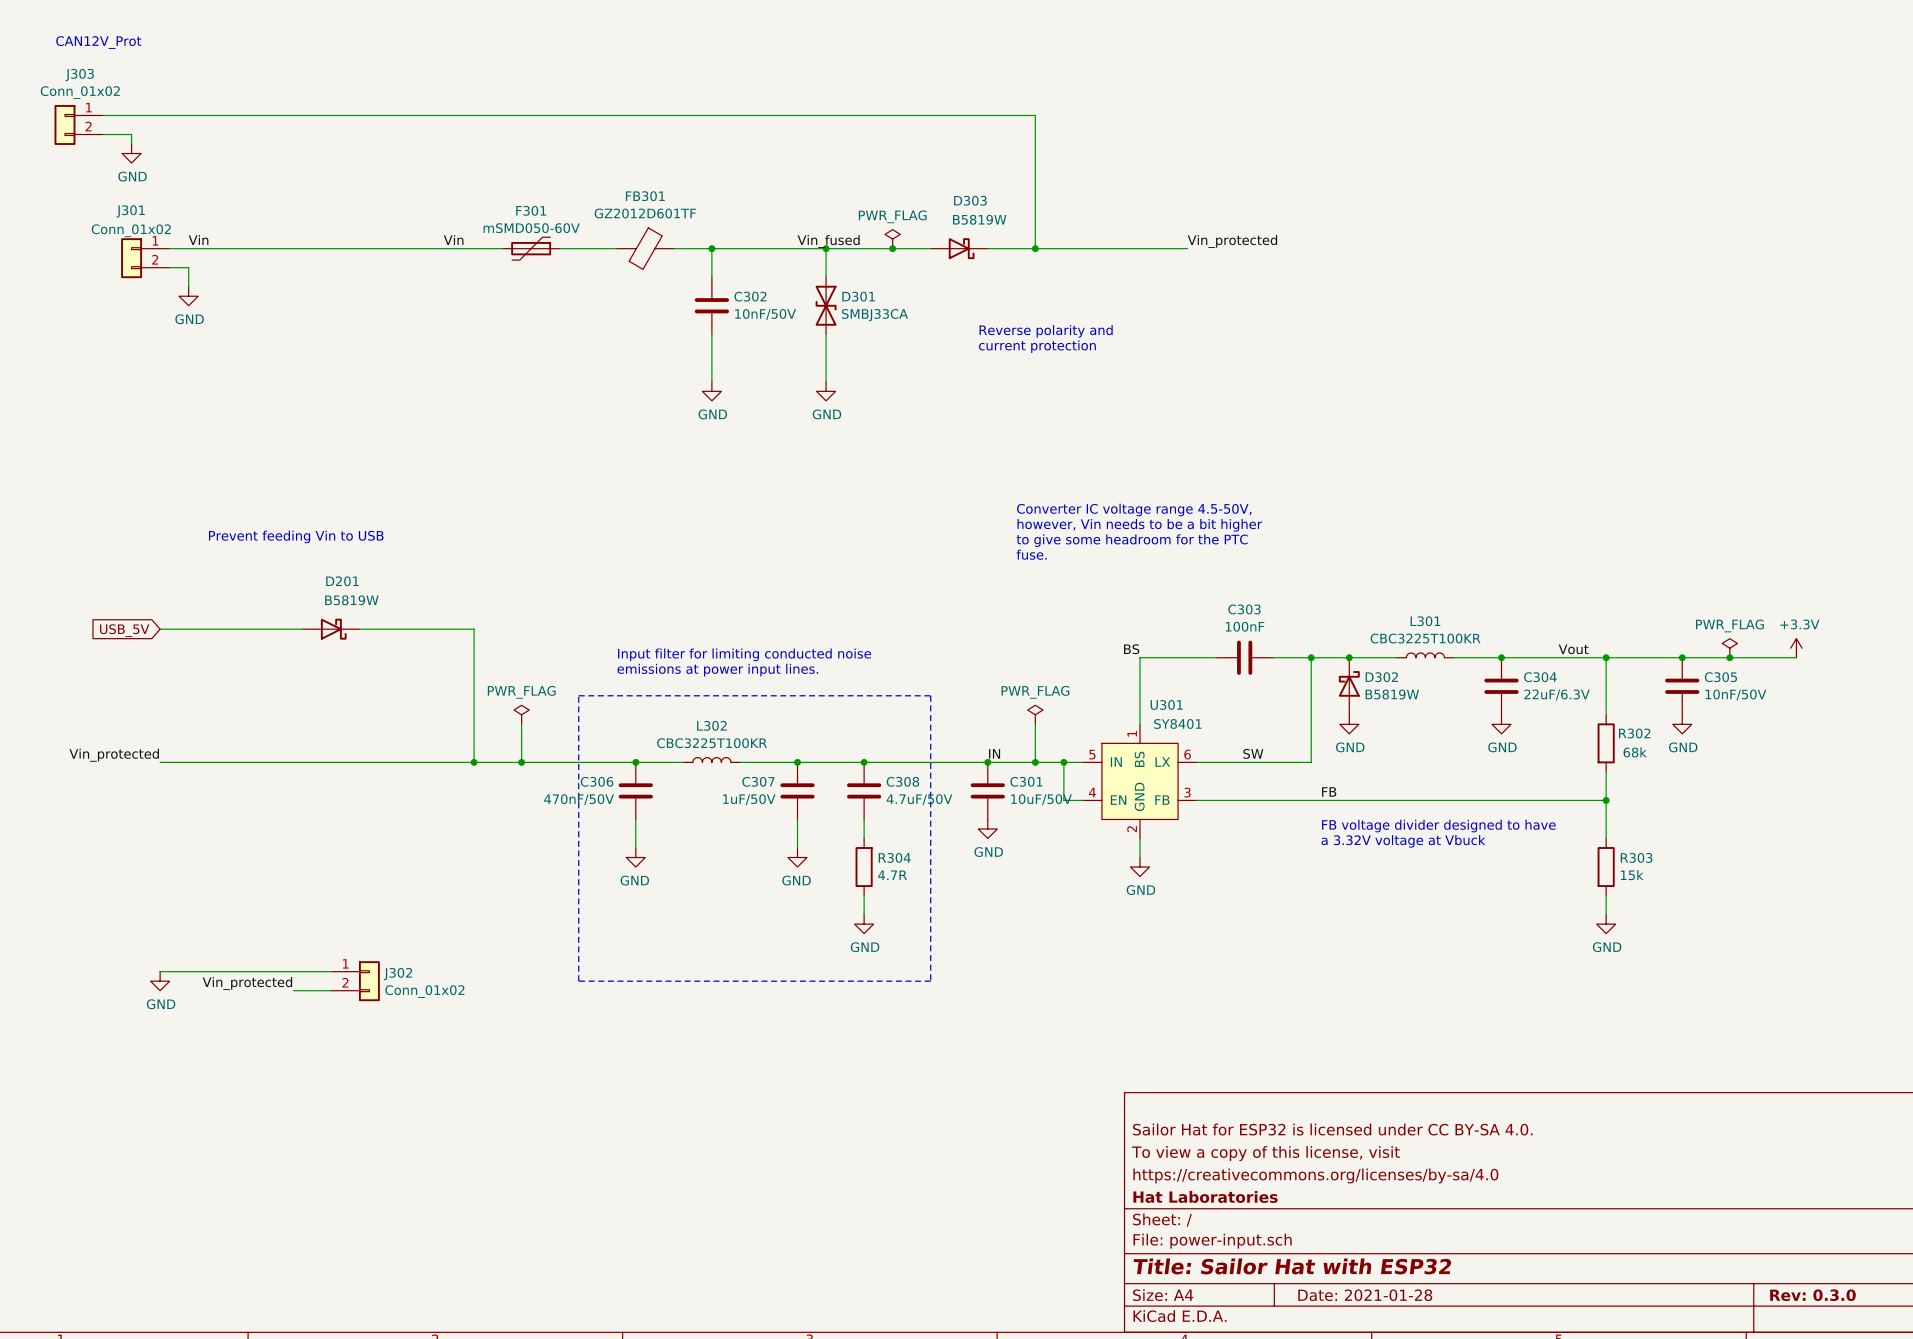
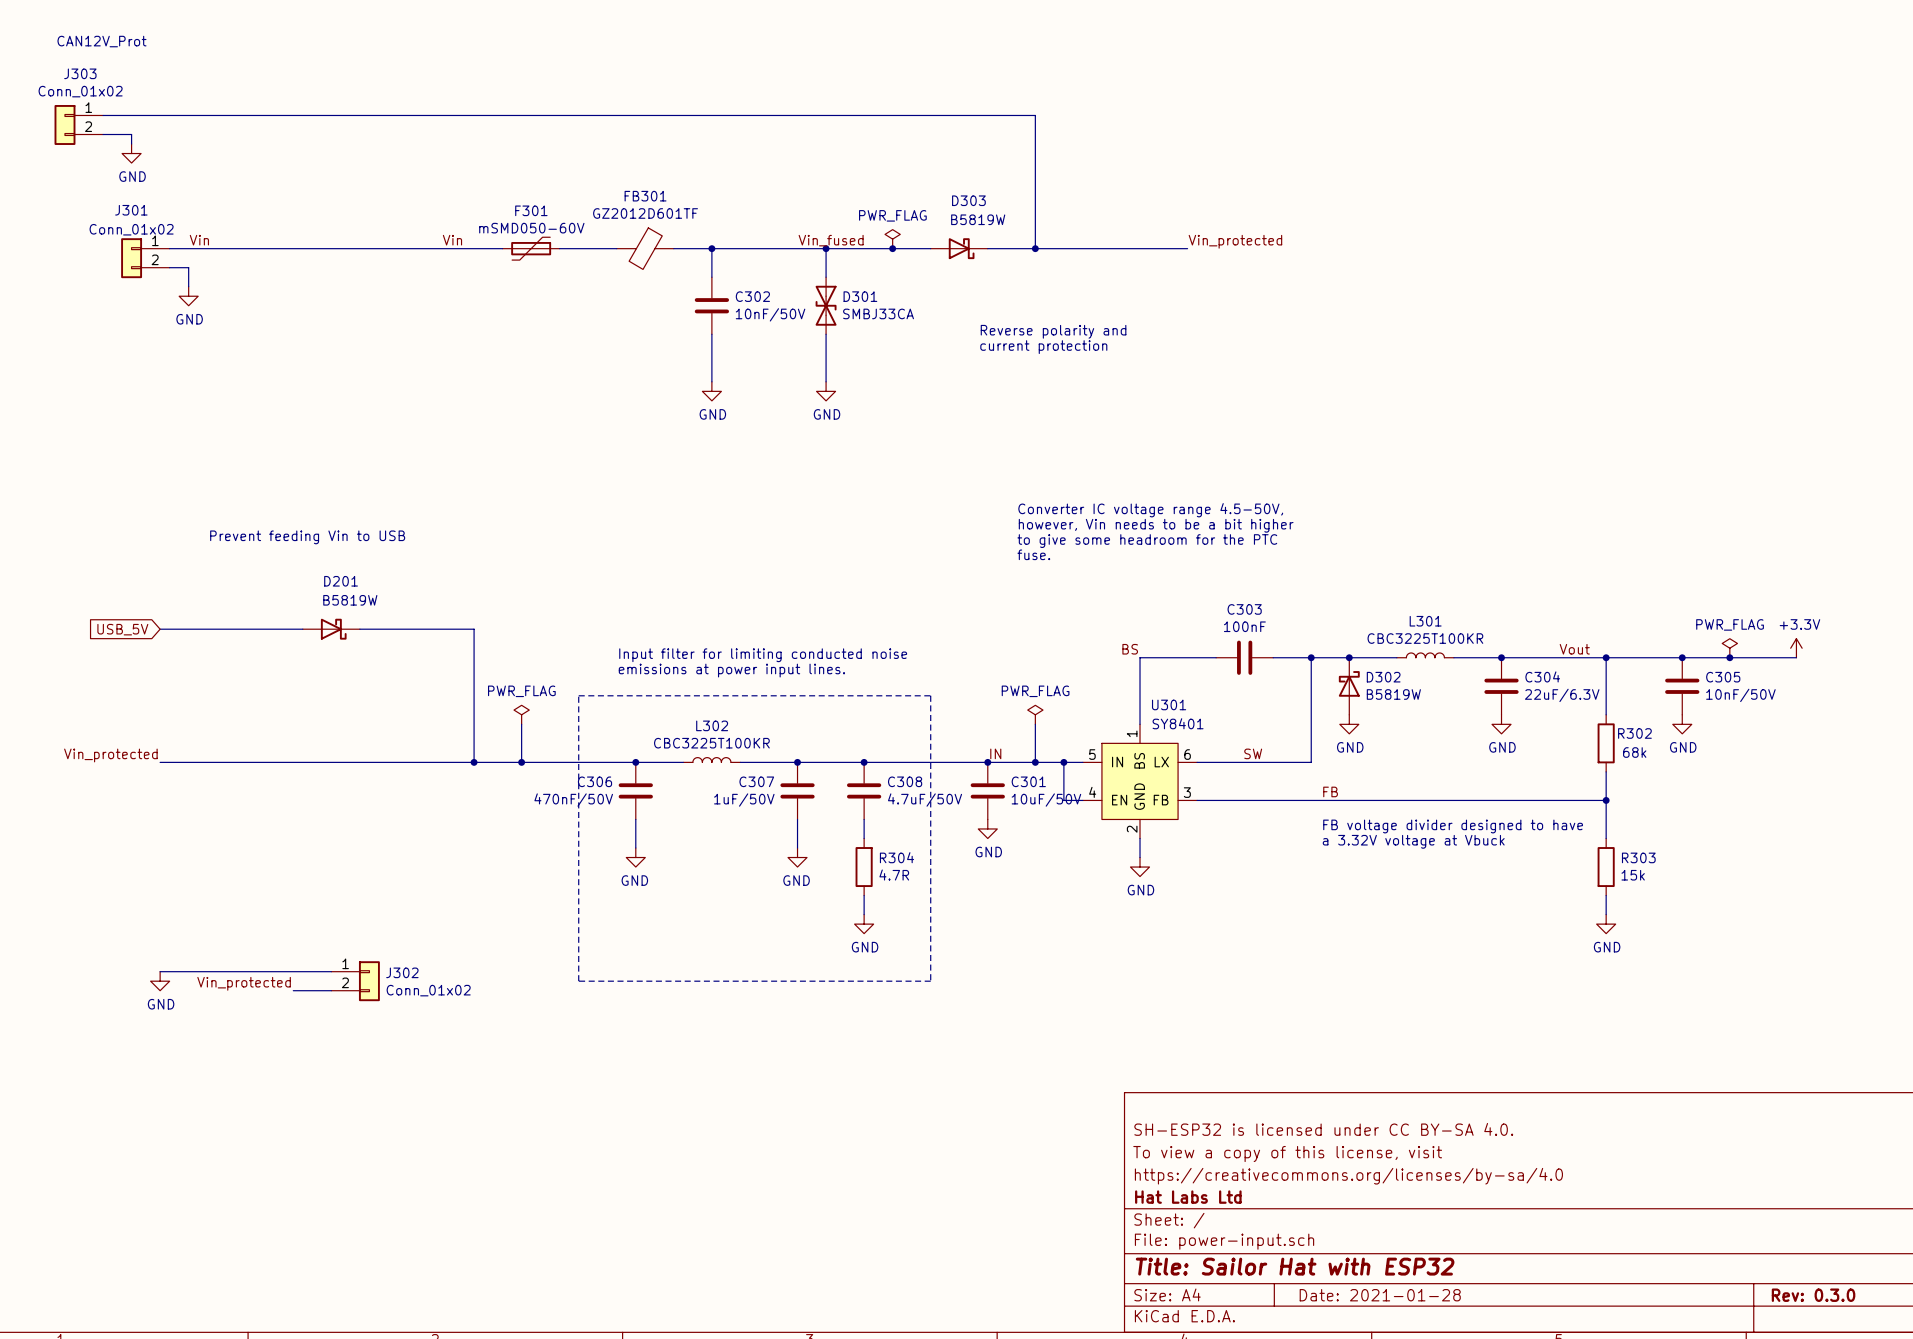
title block: Sailor Hat for ESP32 is licensed under CC BY-SA 4.0. (1332, 1129) -> SH-ESP32 is licensed under CC BY-SA 4.0. (1323, 1129)
title block: Hat Laboratories (1205, 1196) -> Hat Labs Ltd (1188, 1197)

